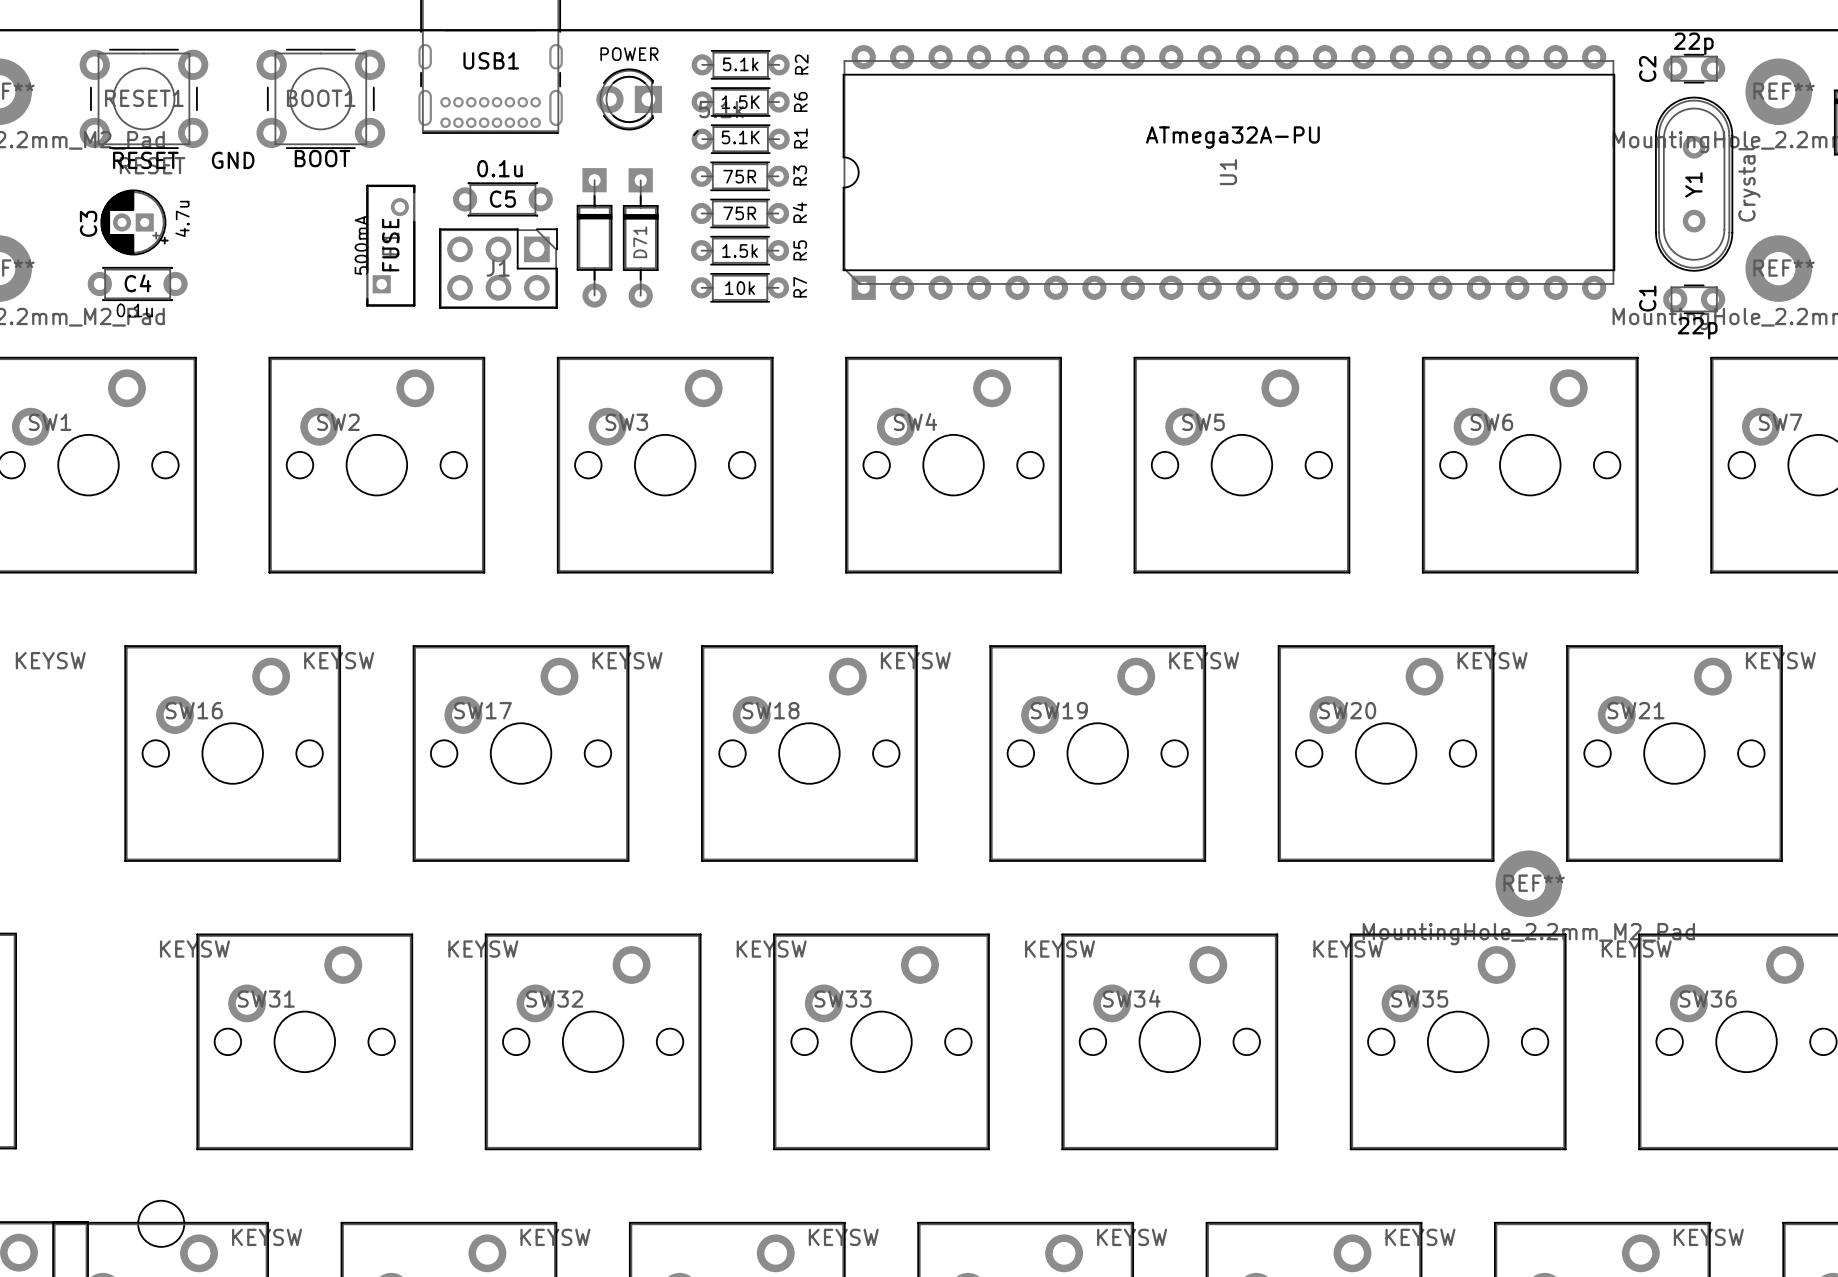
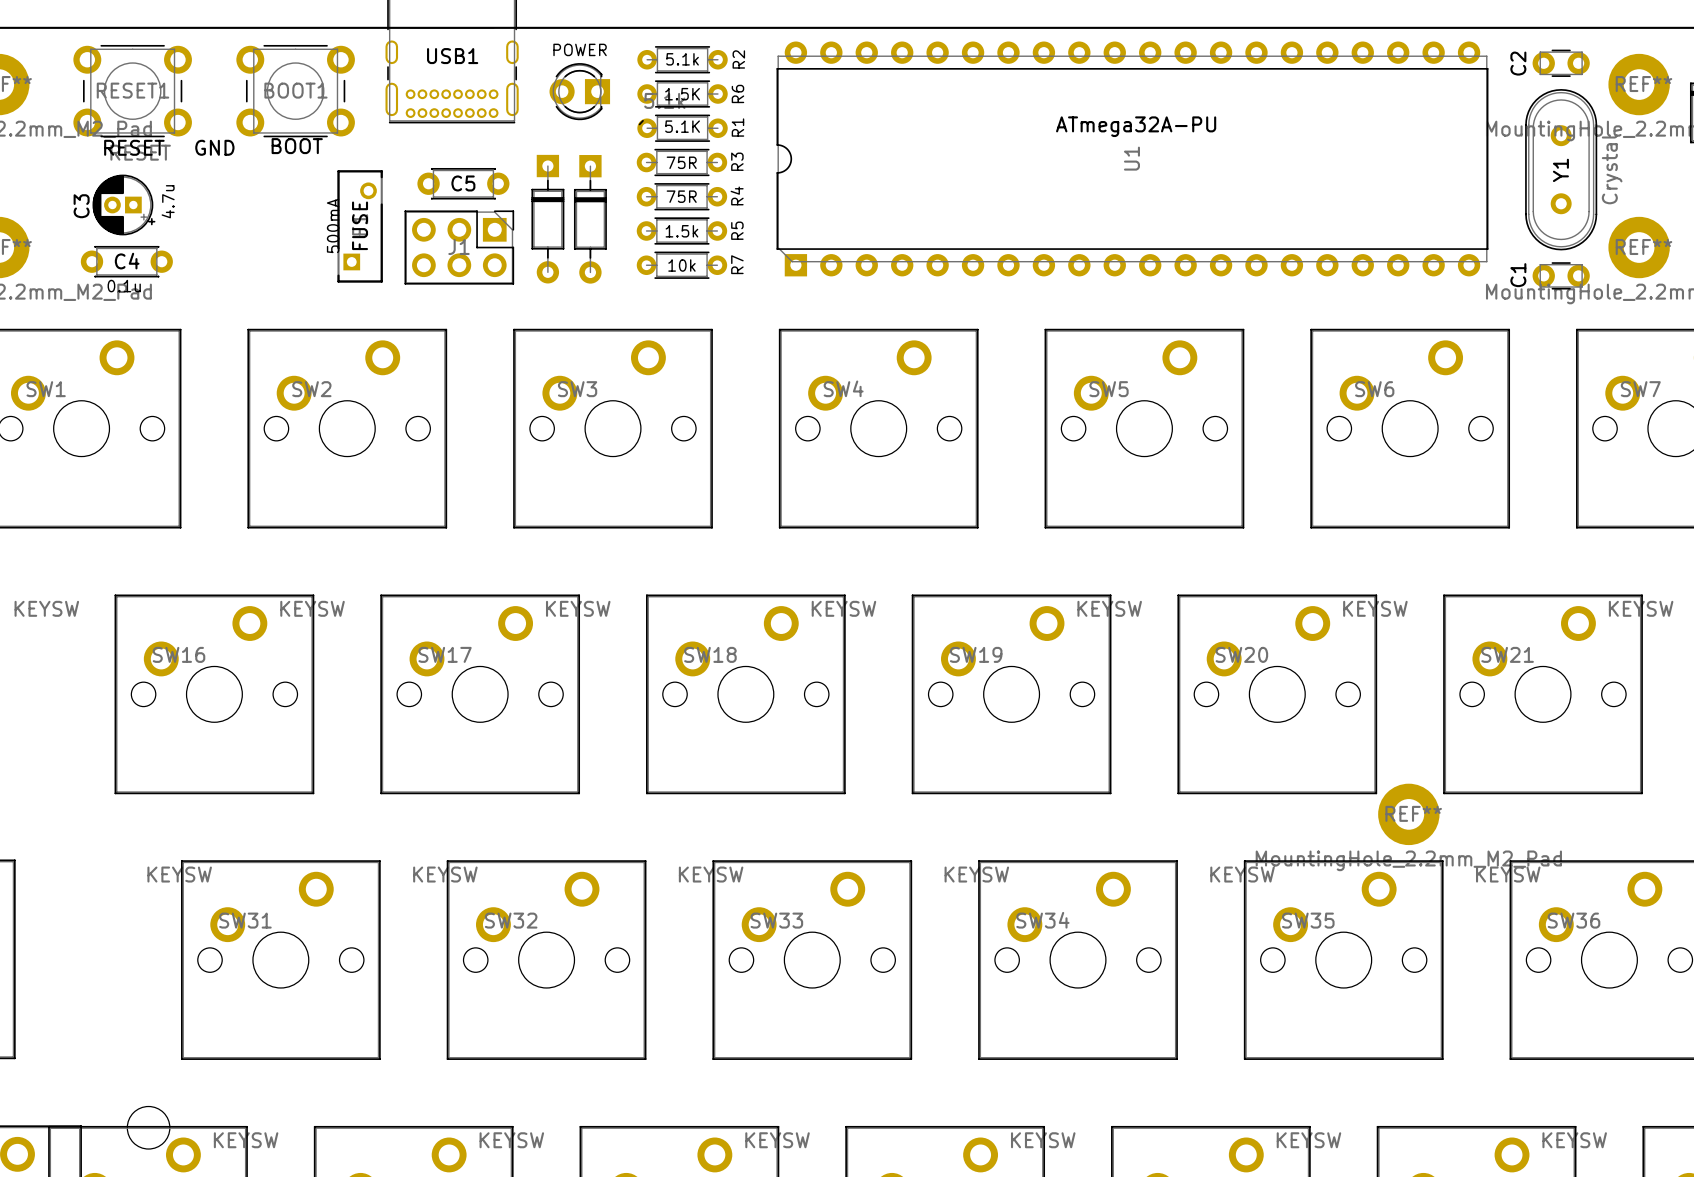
C2 value: 22p (1693, 43) -> none
C5 value: 0.1u (499, 168) -> none
D71 name: D71 (640, 242) -> none
C1 value: 22p (1697, 328) -> none

